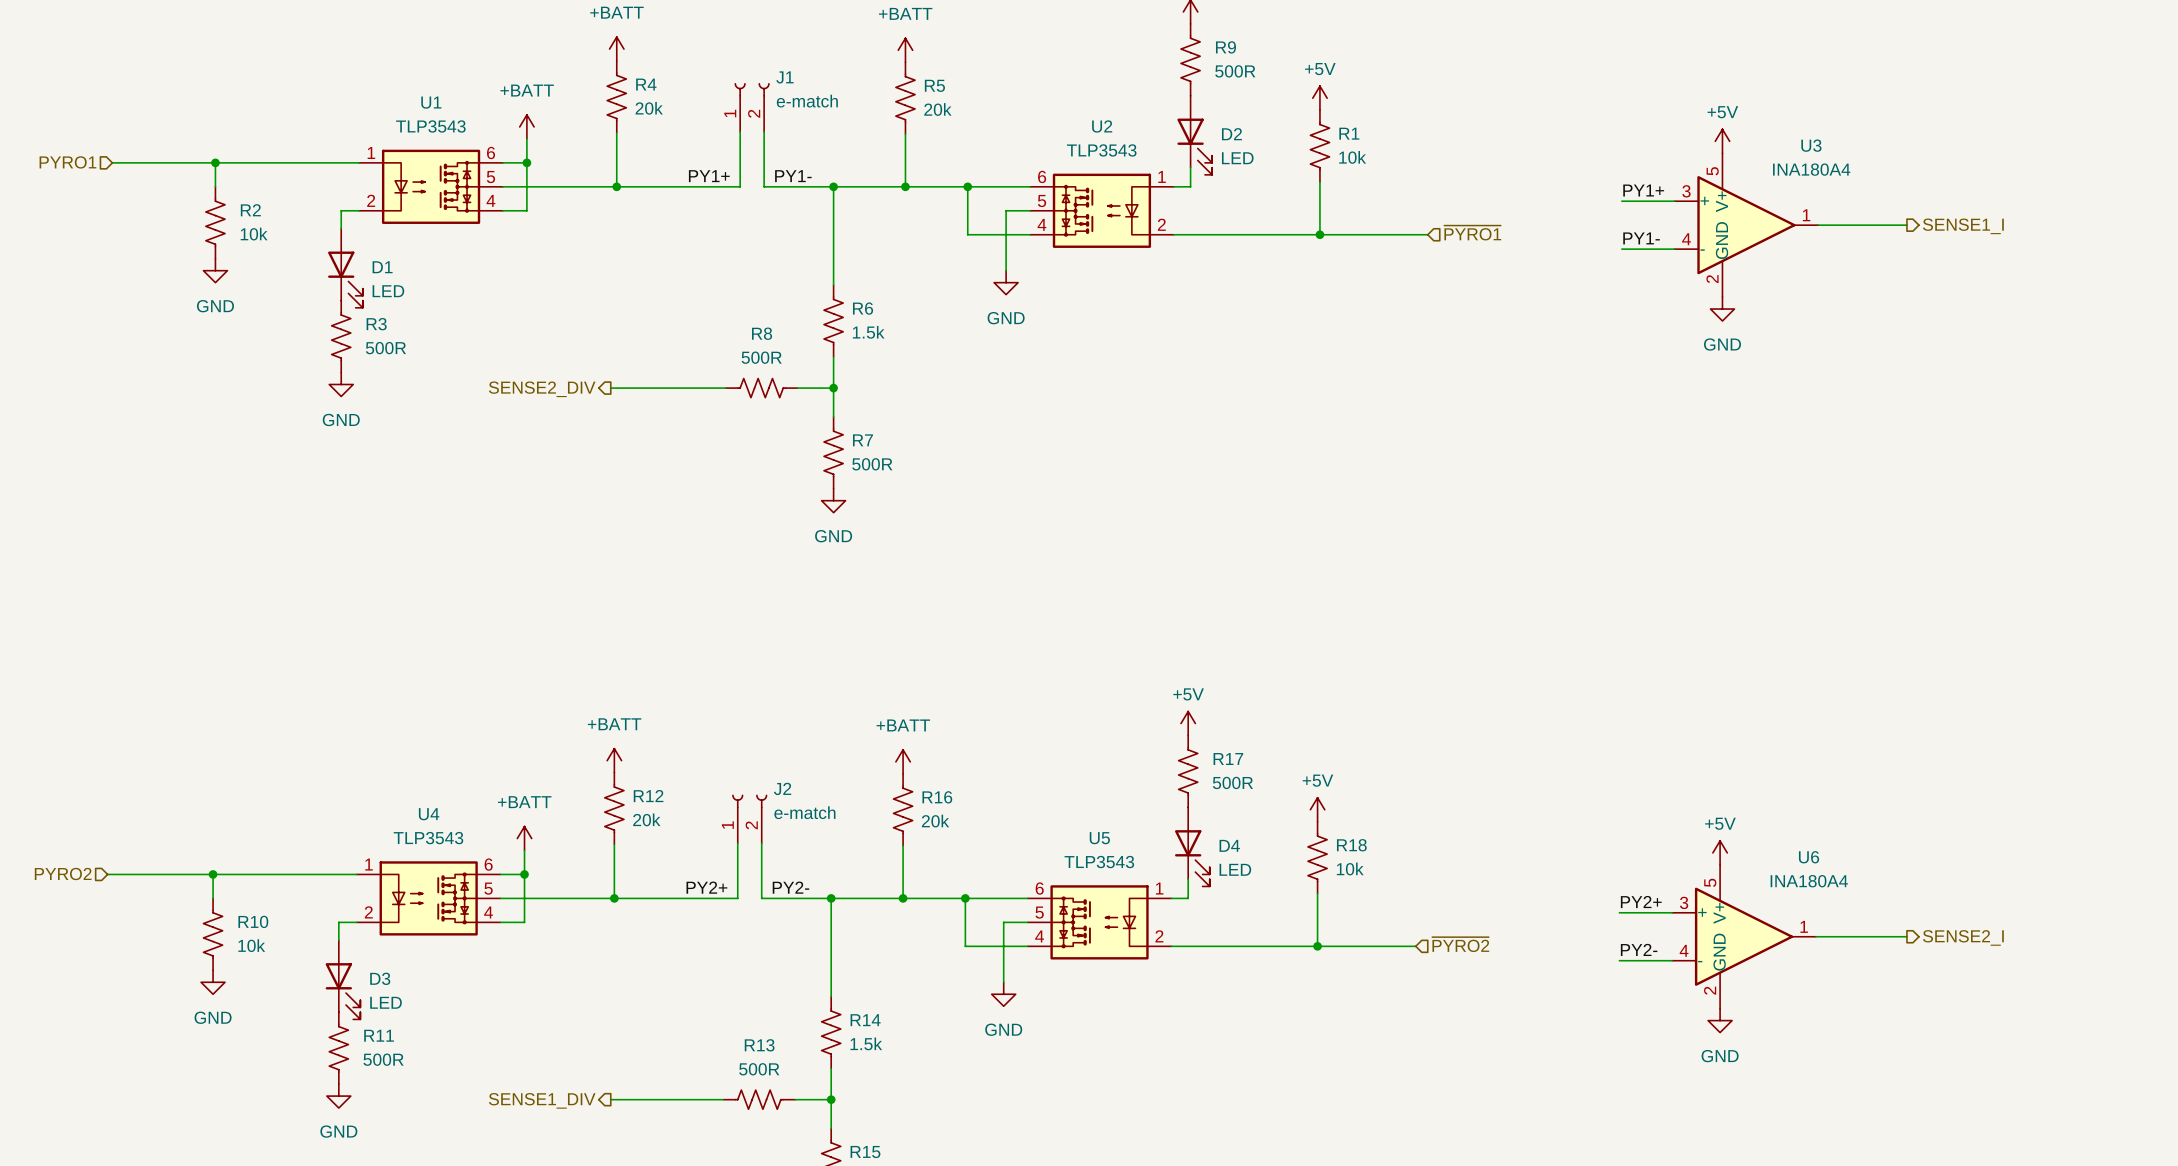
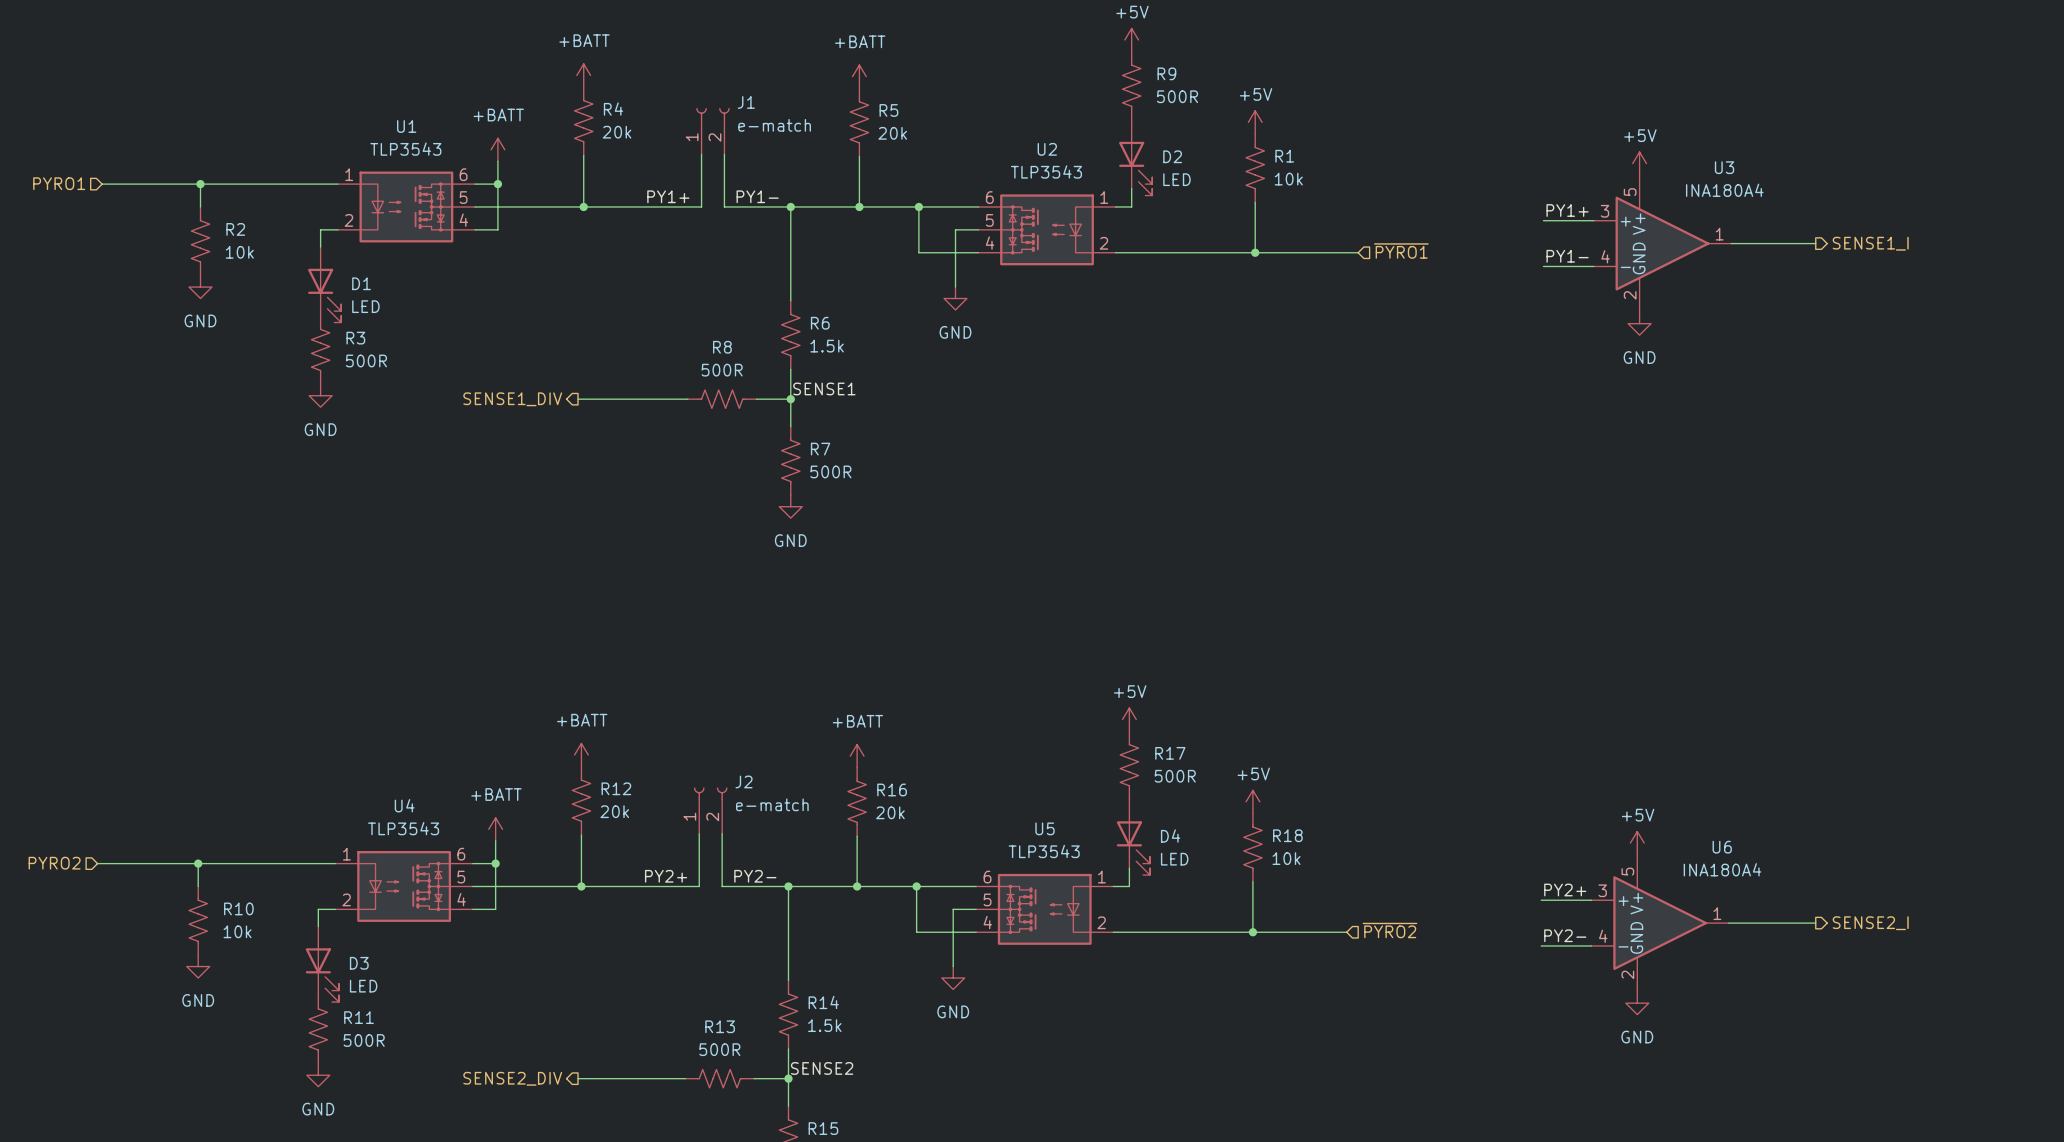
label: none -> SENSE1 (824, 388)
hierarchical label: SENSE2_DIV (542, 389) -> SENSE1_DIV (512, 399)
label: none -> SENSE2 (822, 1068)
hierarchical label: SENSE1_DIV (542, 1100) -> SENSE2_DIV (512, 1078)

